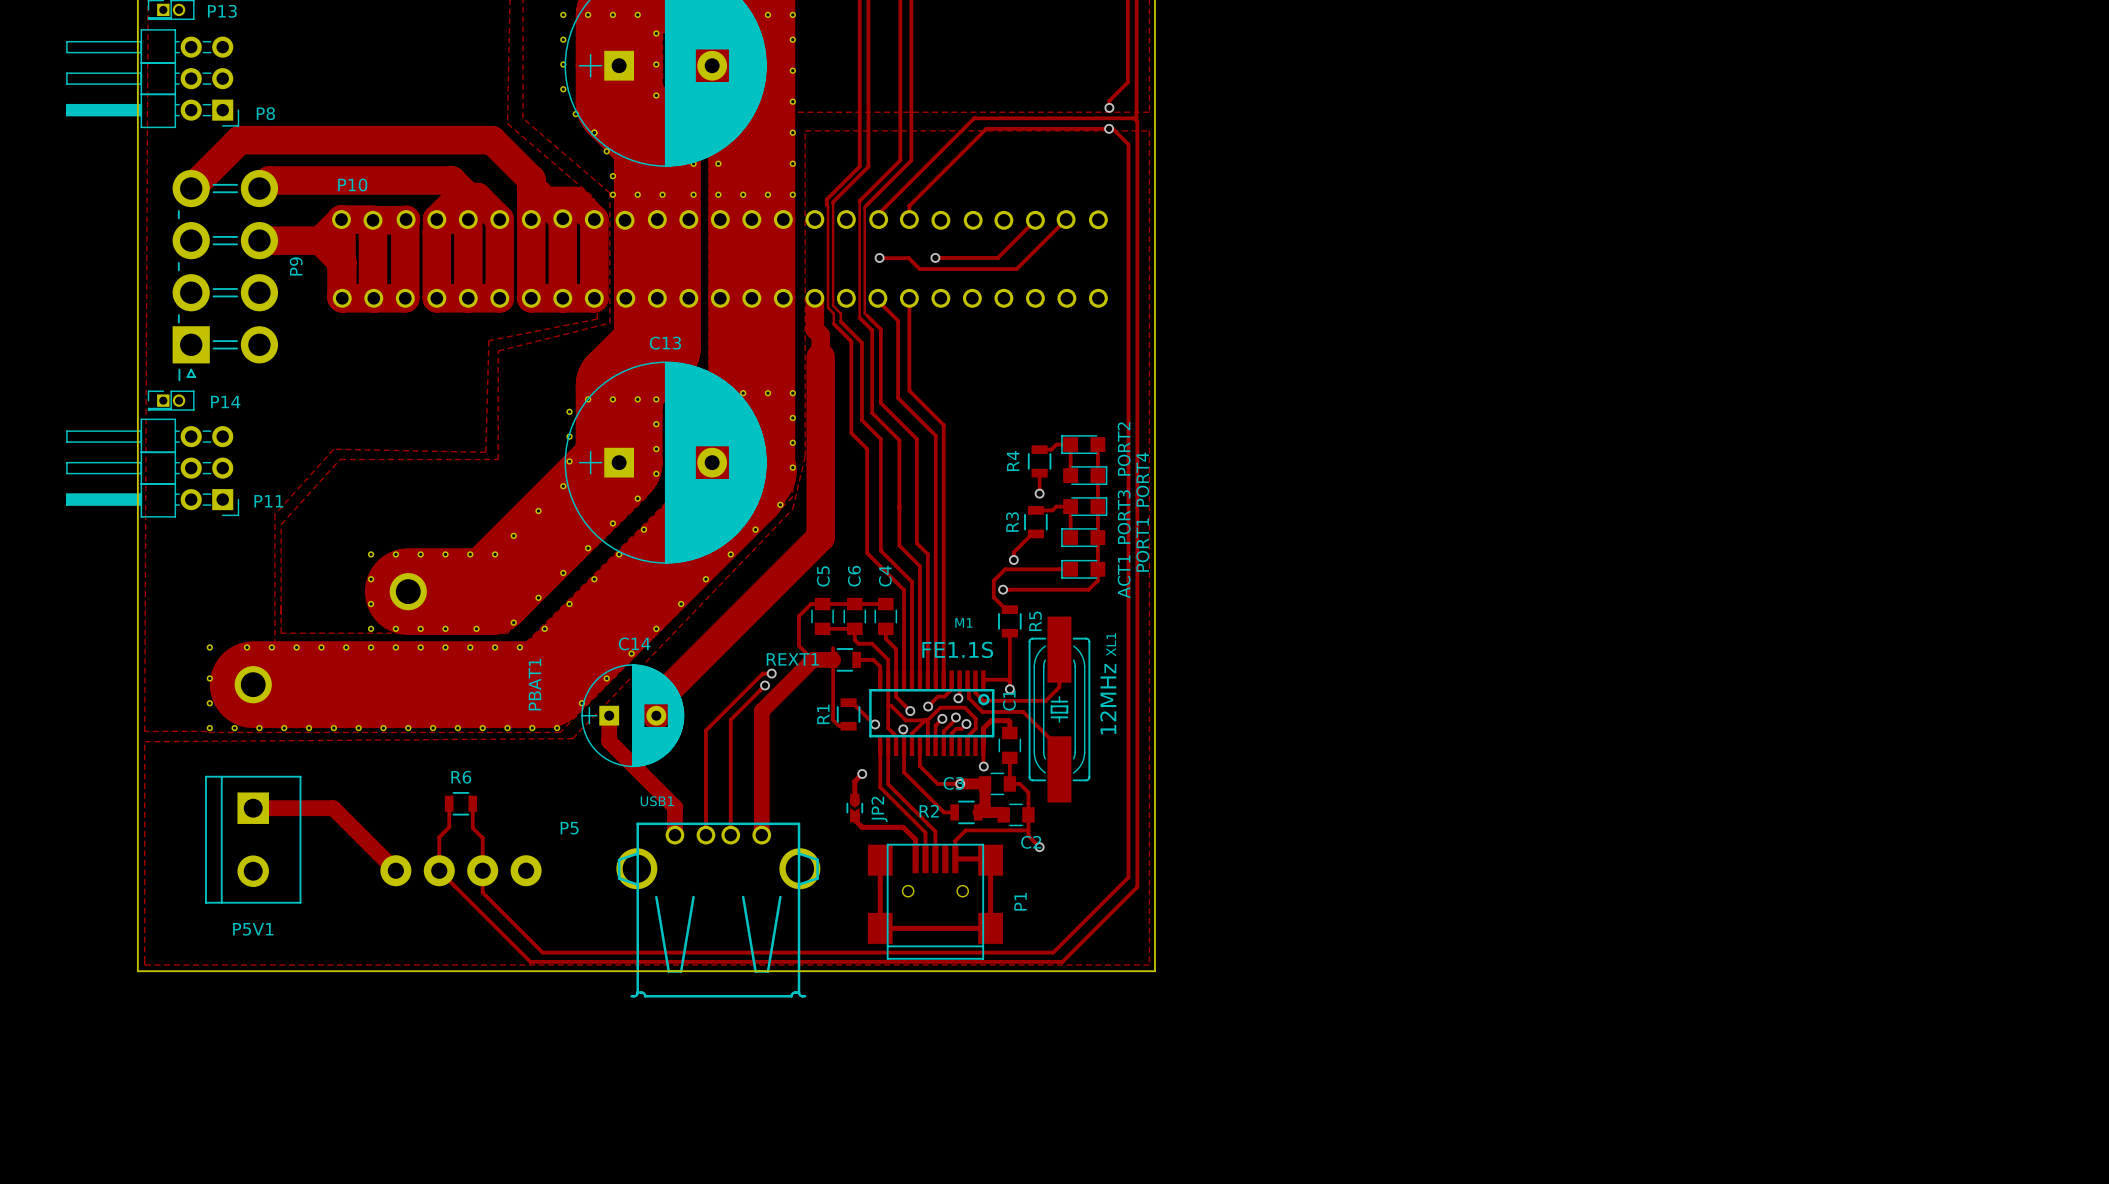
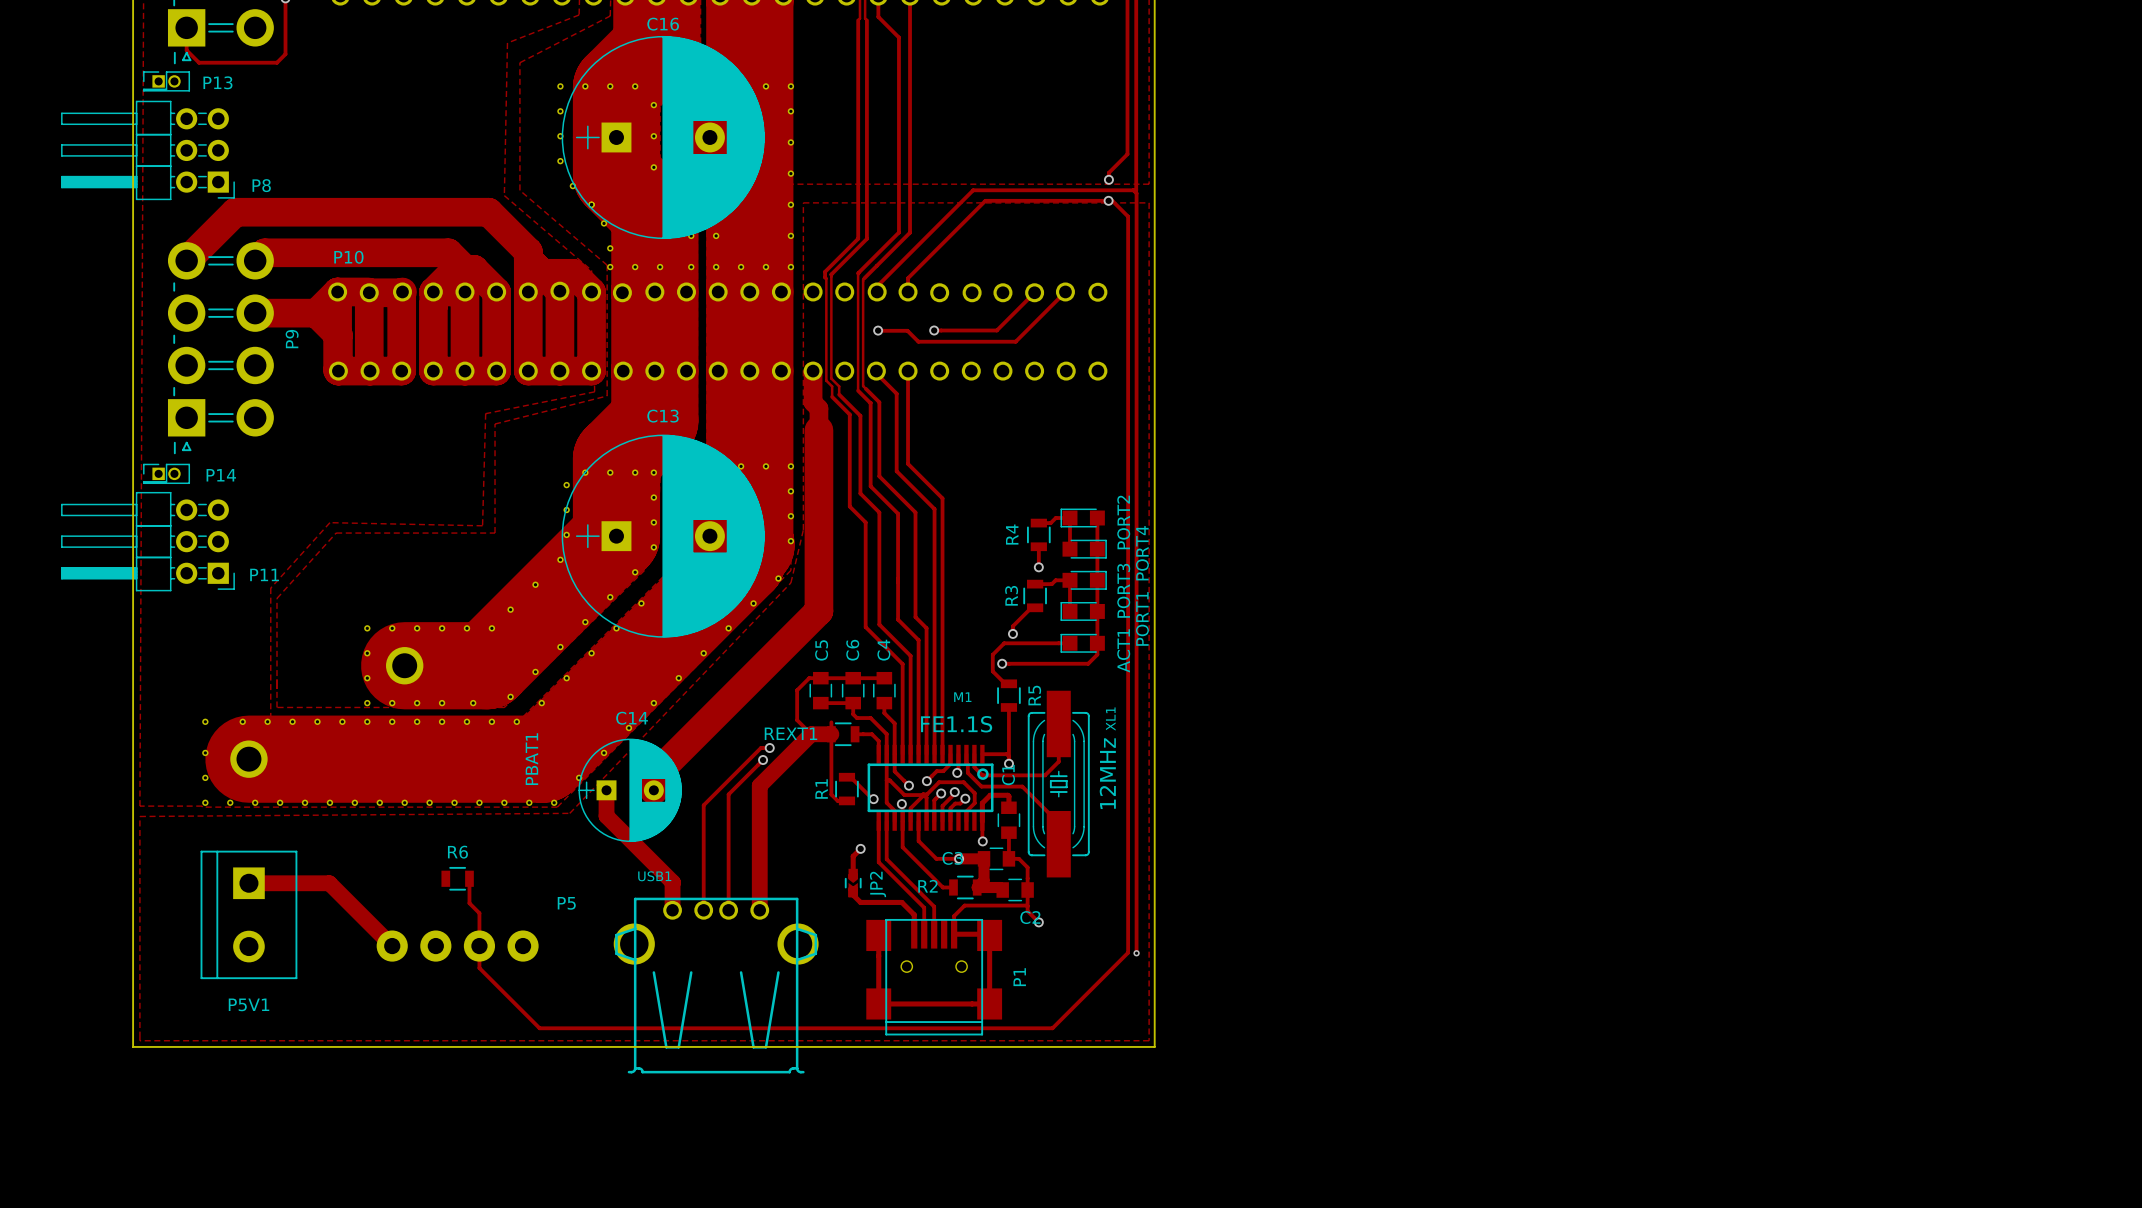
track: (1136, 121) (1137, 887) (1062, 961) (530, 961) (439, 870) (439, 837) (449, 827) (449, 803) -> (1136, 193) (1136, 953)
via: none -> (1136, 953)

